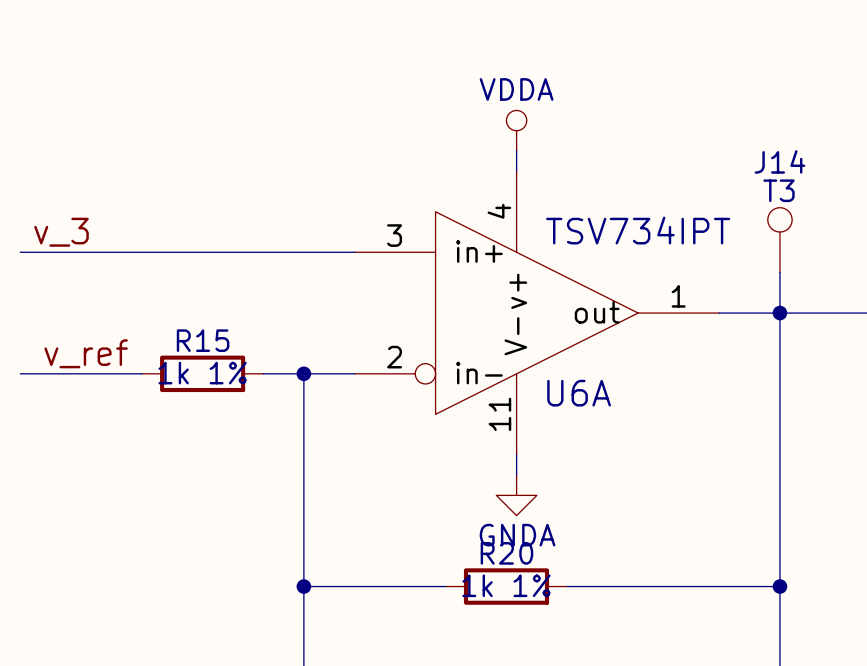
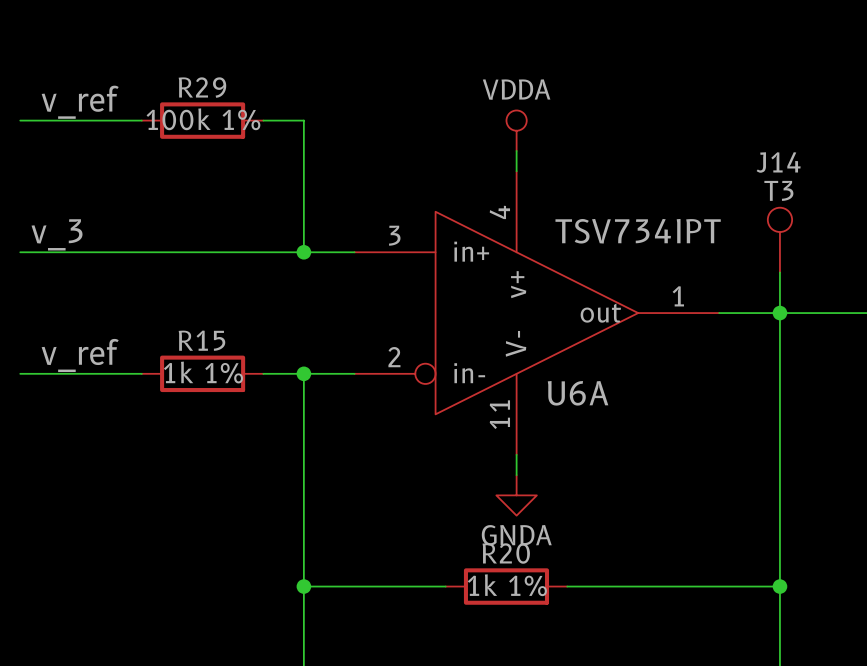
label: none -> v_ref (80, 102)
wire: none -> (20, 120) (141, 120)
R29: none -> 100k 1% (202, 120)
wire: none -> (263, 120) (303, 120) (303, 252)
junction: none -> (303, 252)

